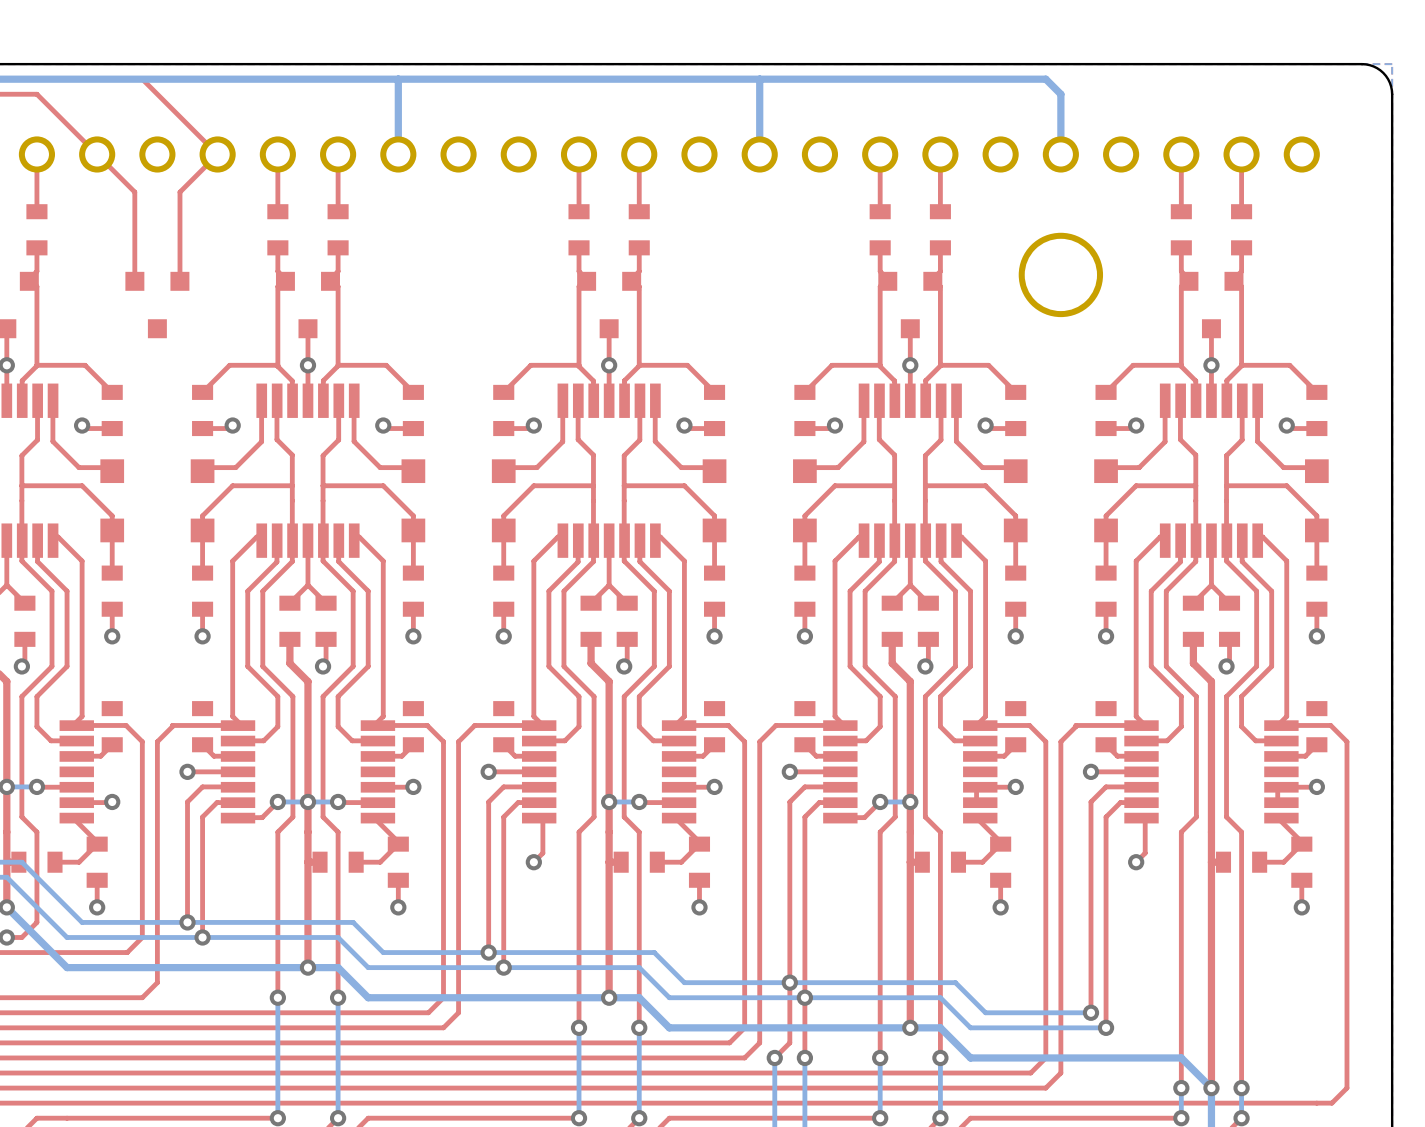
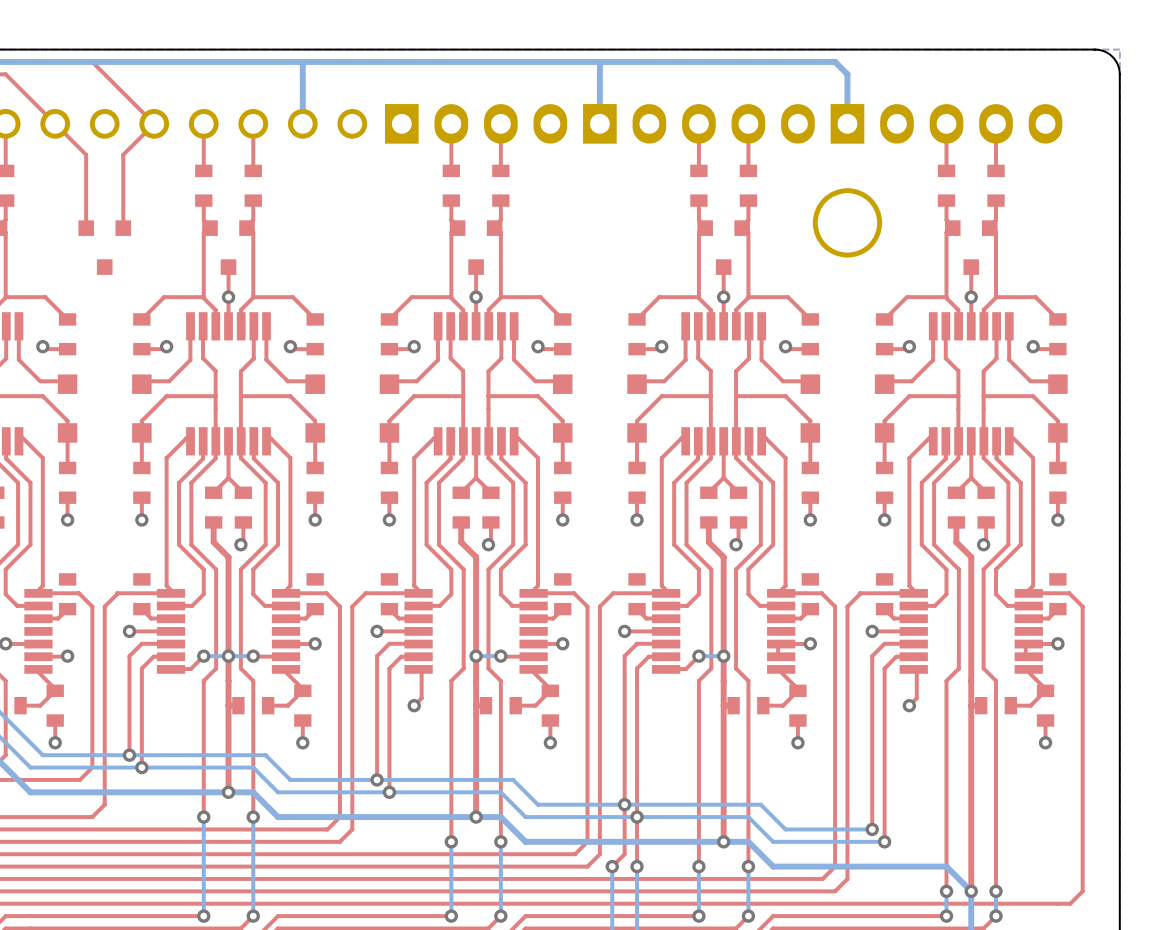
part footprint: [500, 136, 718, 173] -> [384, 104, 568, 144]
part footprint: [741, 136, 1019, 173] -> [583, 104, 815, 144]
part footprint: [1042, 136, 1320, 173] -> [830, 104, 1063, 144]

